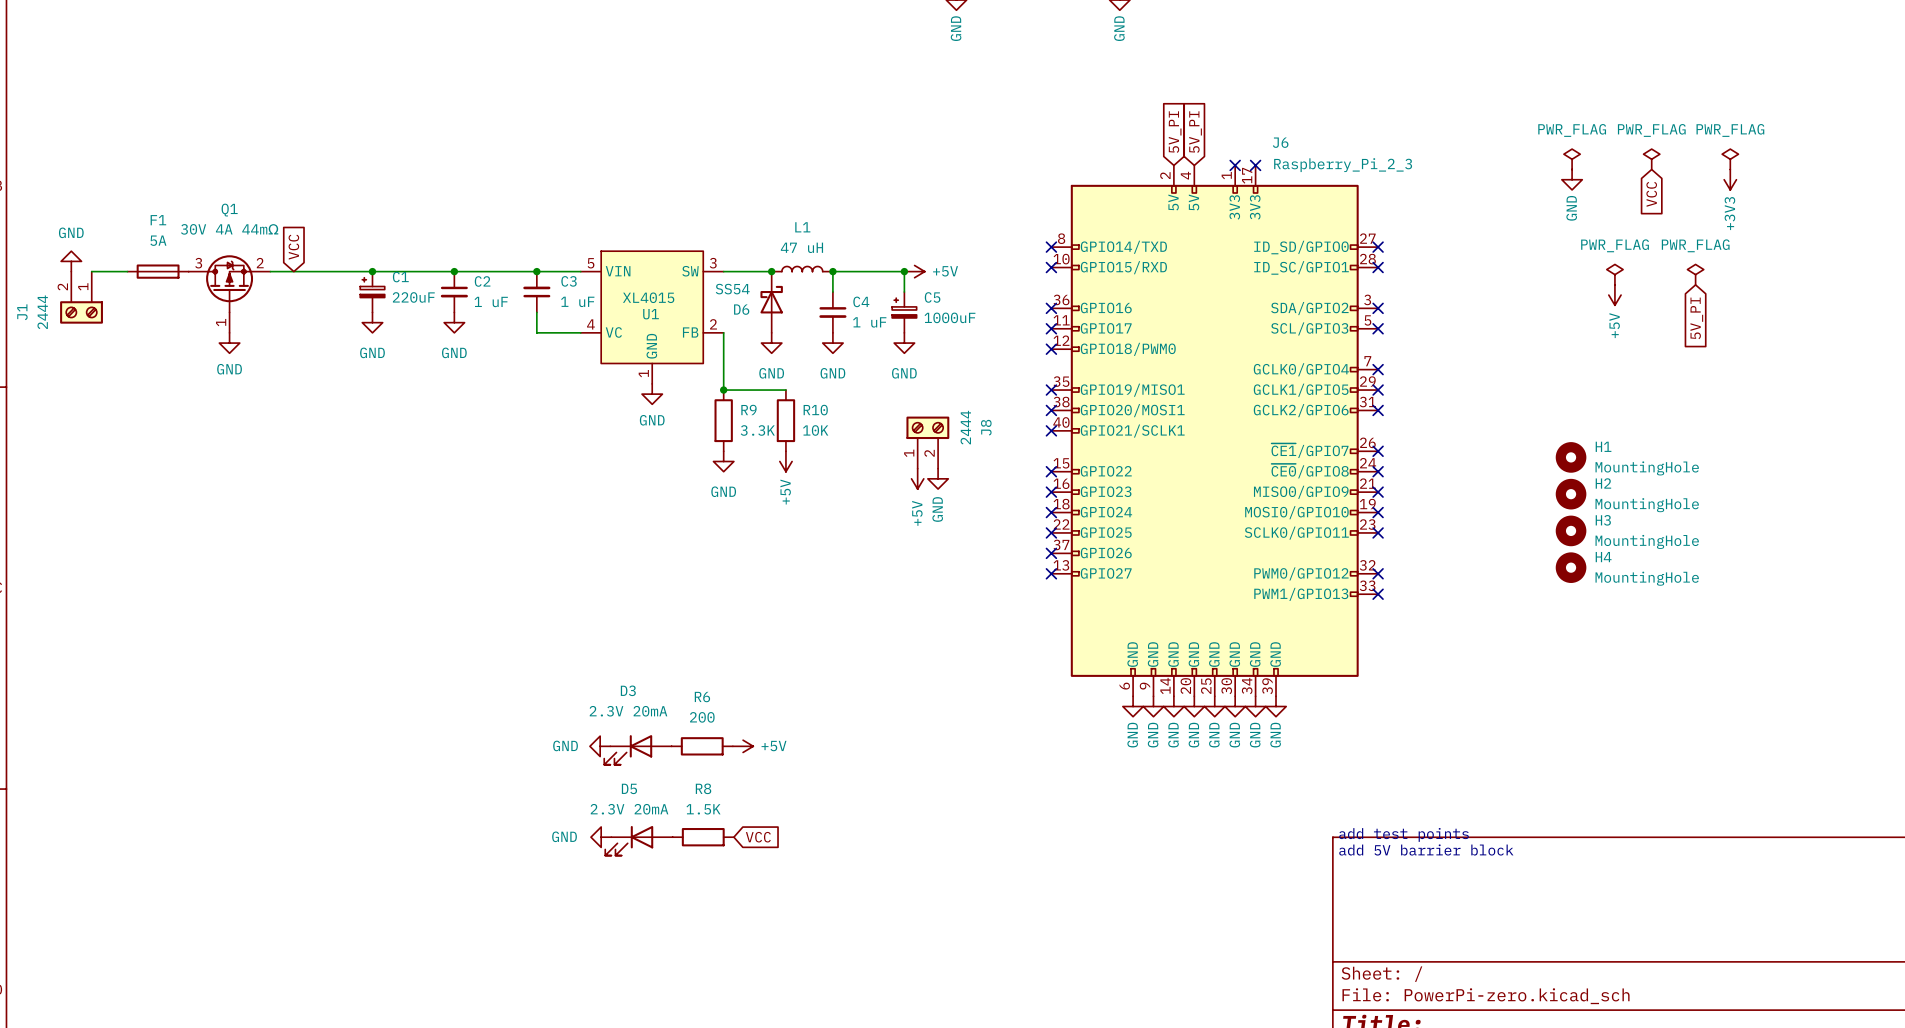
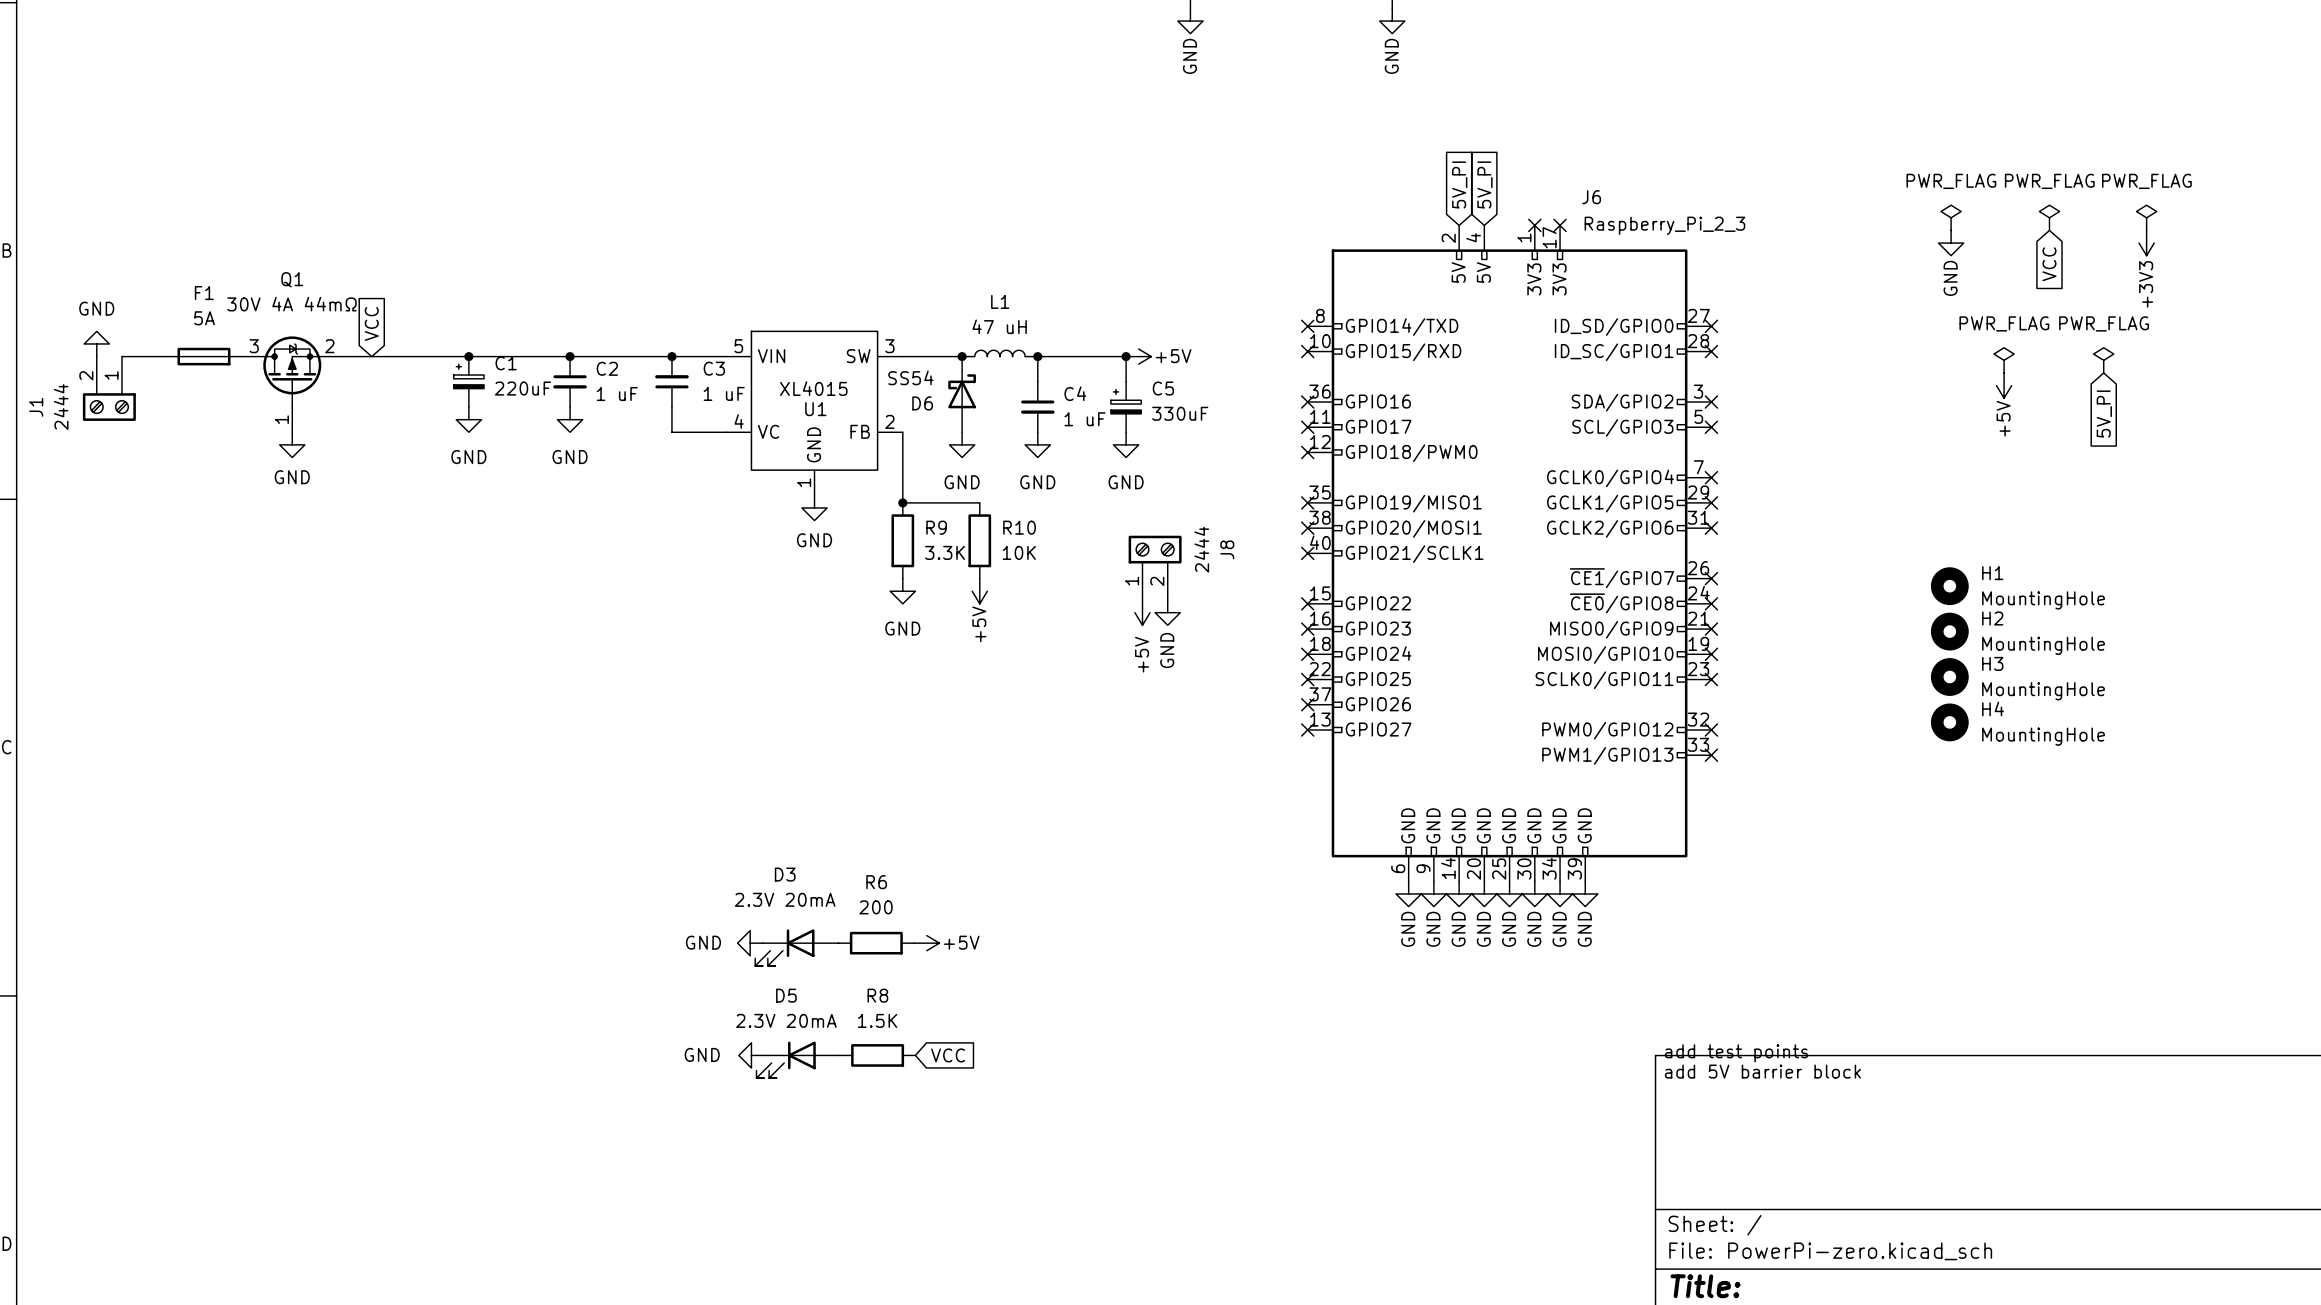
C5 value: 1000uF (949, 317) -> 330uF (1180, 413)

